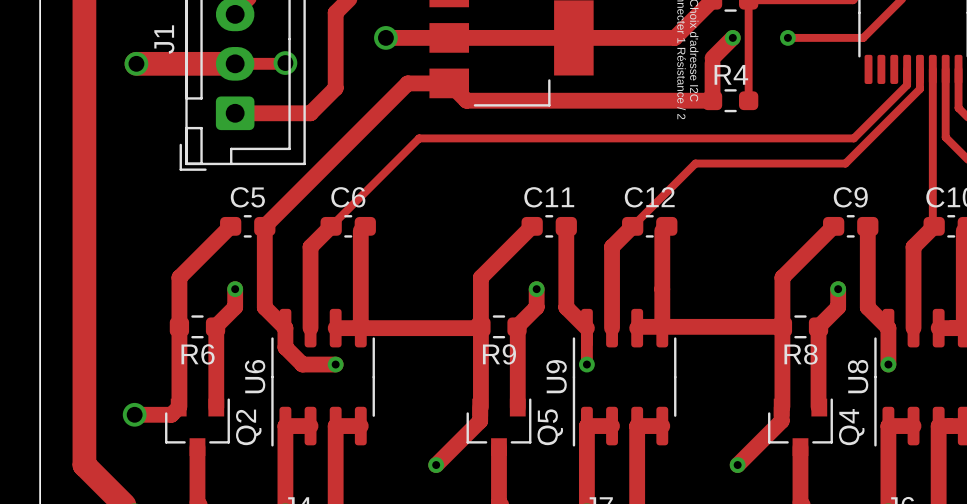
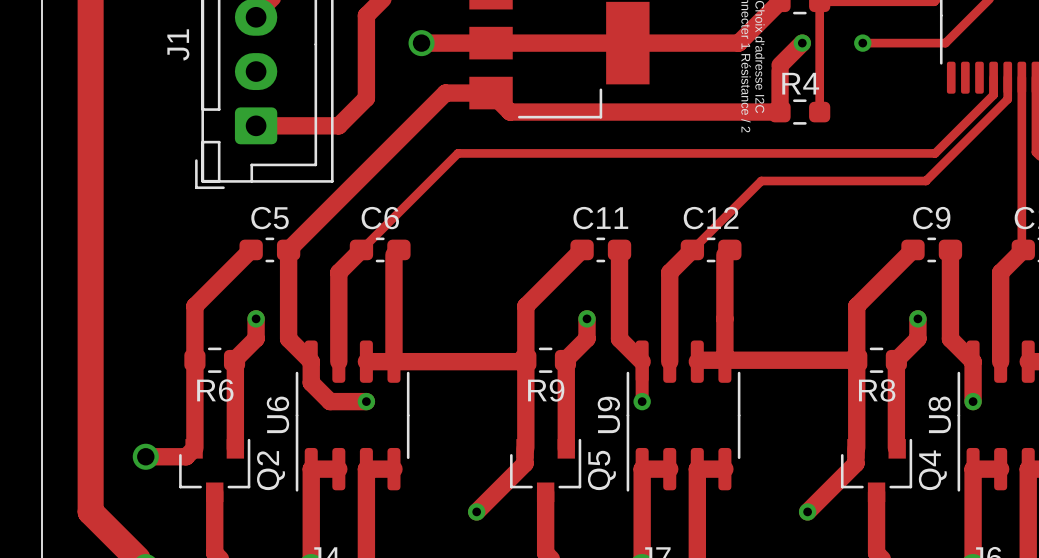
via: (136, 63) -> none
track: (285, 63) (136, 63) -> none
via: (285, 63) -> none

